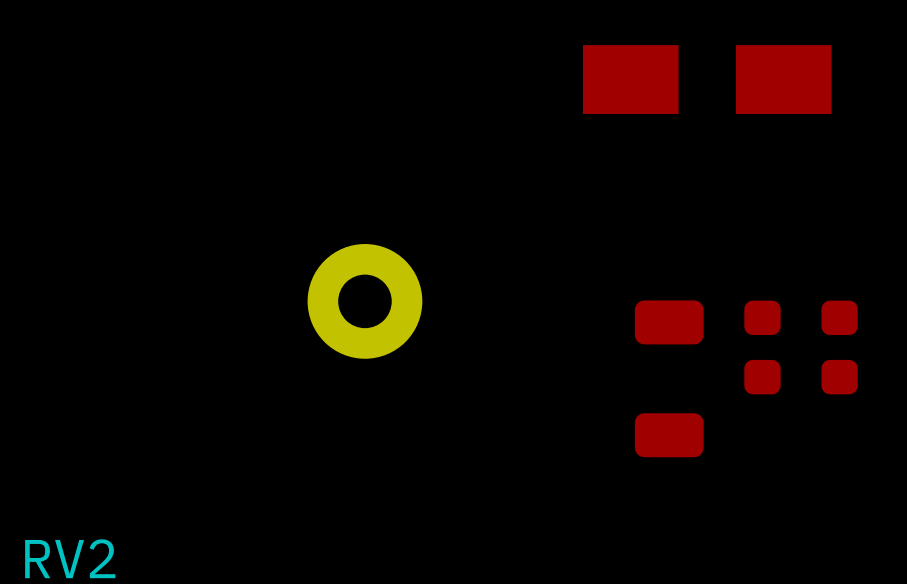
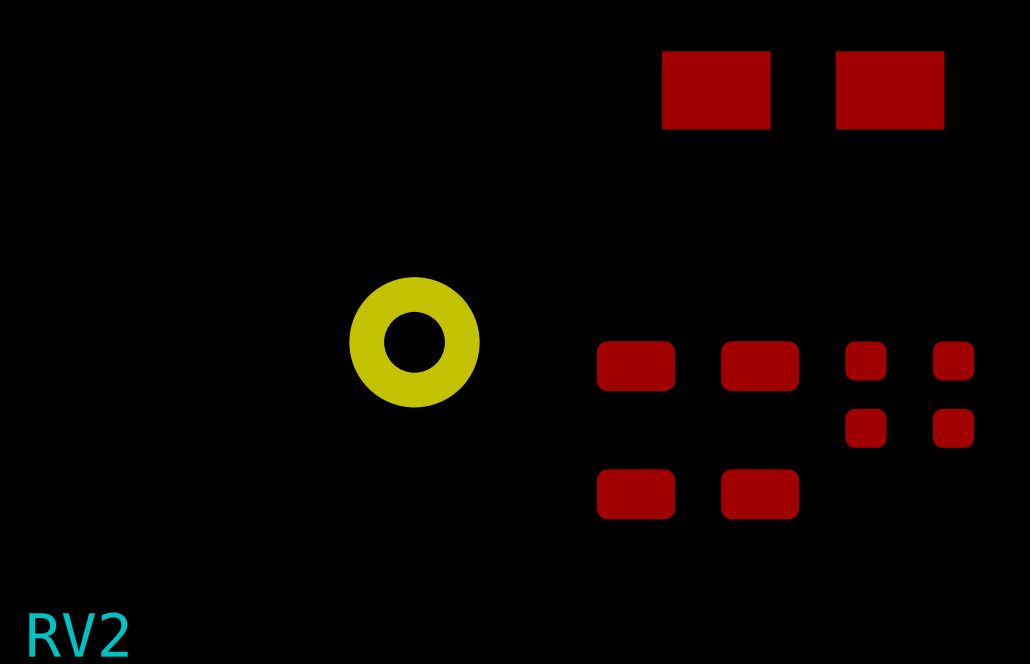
part: none -> (636, 430)

